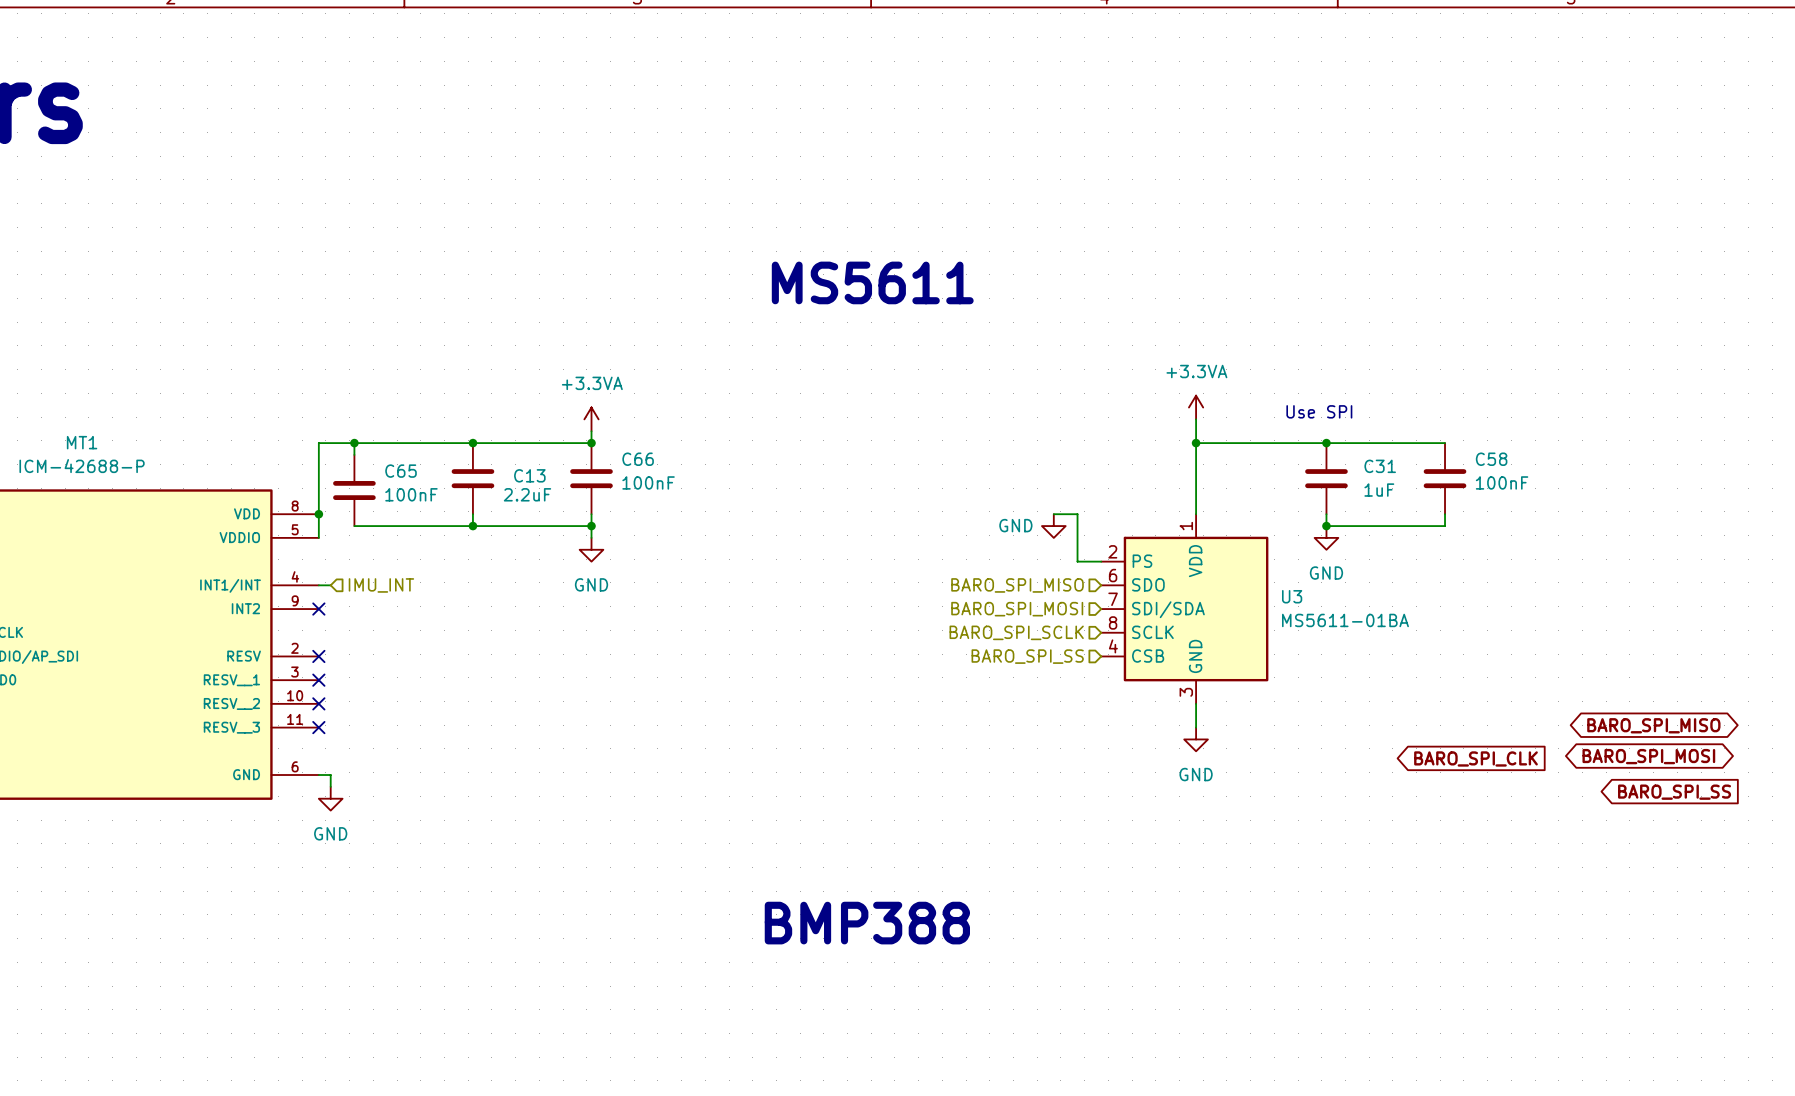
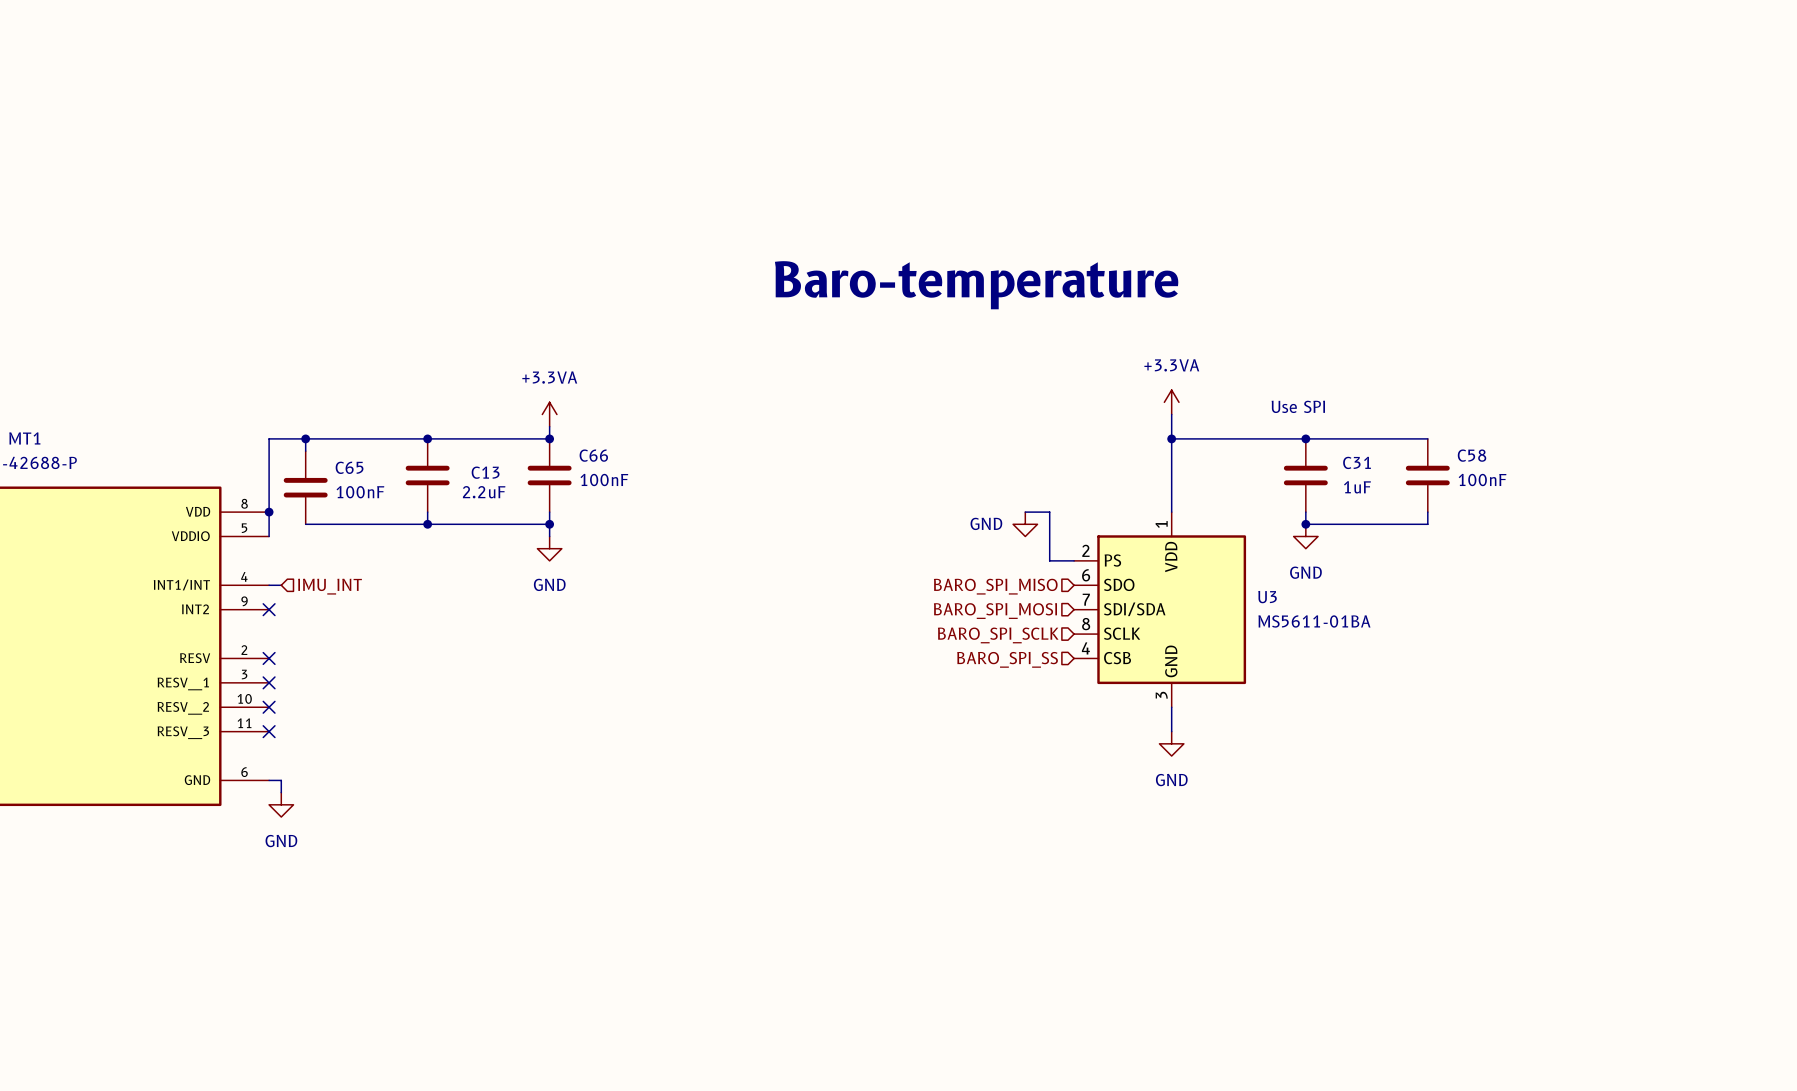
text: MS5611 (872, 282) -> none
text: none -> Baro-temperature (976, 285)
global label: BARO_SPI_MISO (1653, 725) -> none
global label: BARO_SPI_MOSI (1648, 756) -> none
global label: BARO_SPI_CLK (1475, 758) -> none
global label: BARO_SPI_SS (1674, 792) -> none
text: BMP388 (867, 923) -> none

